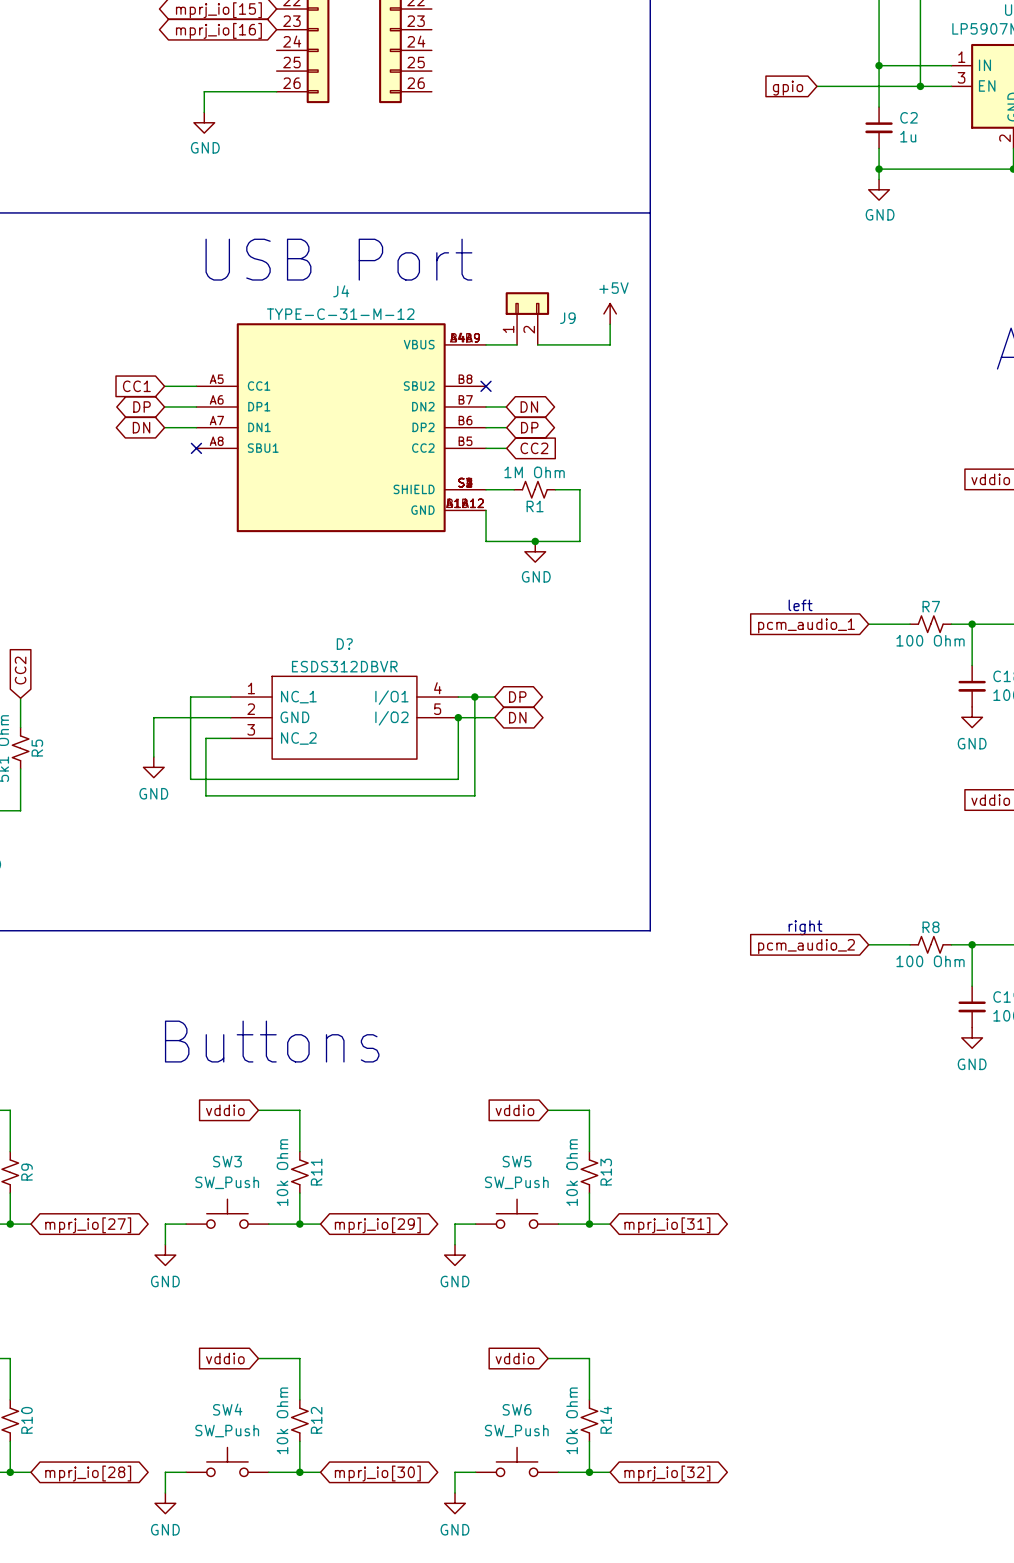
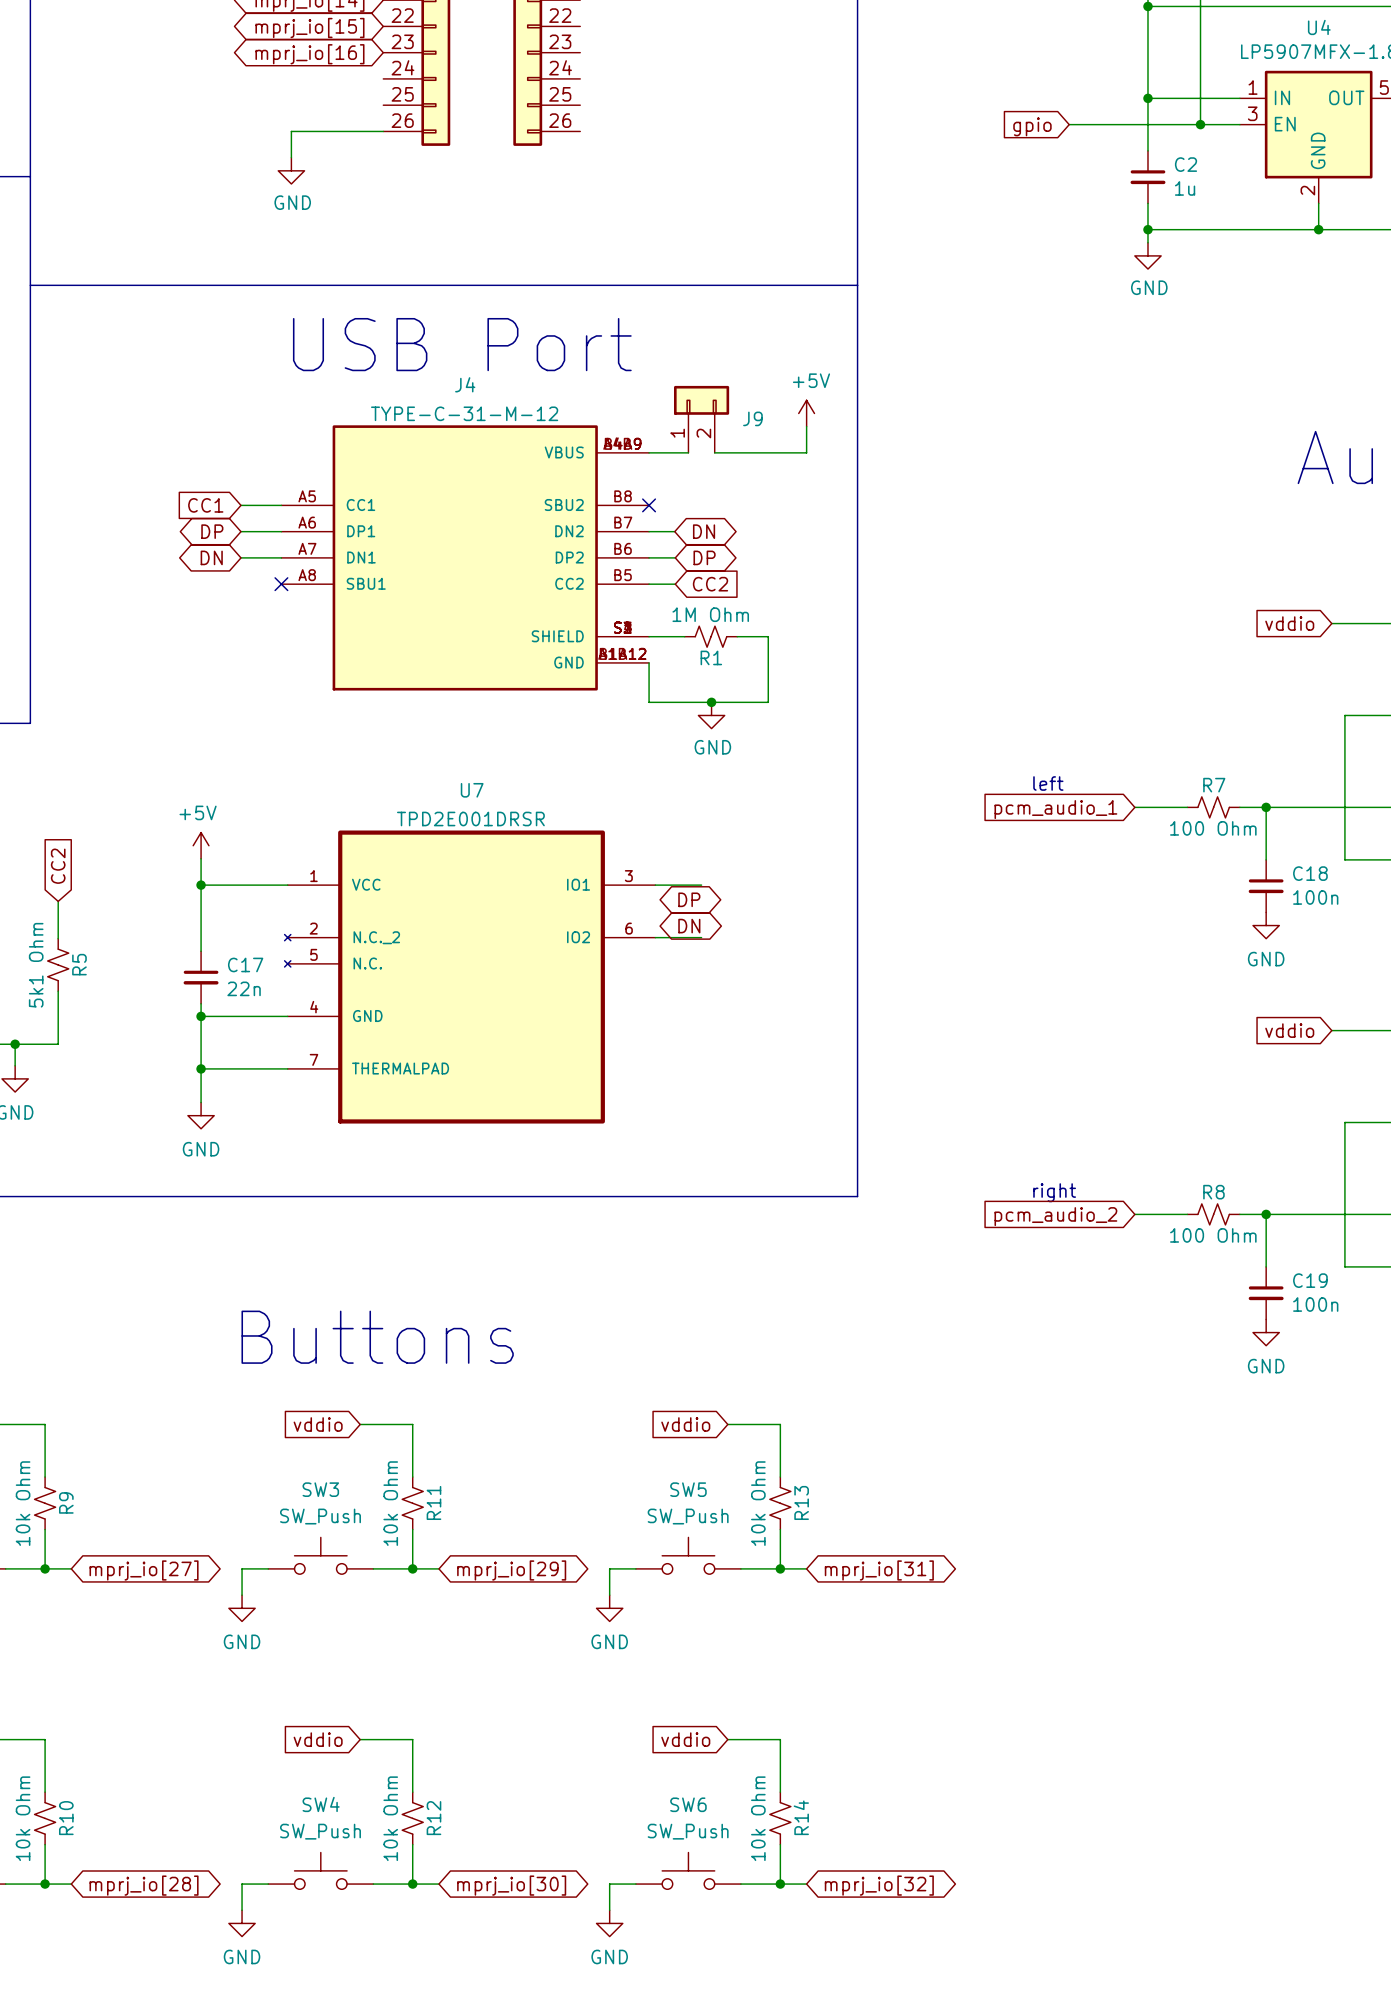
power symbol: none -> +5V (201, 845)
wire: none -> (201, 858) (201, 951)
wire: none -> (201, 885) (287, 885)
junction: none -> (201, 885)
wire: (230, 697) (190, 697) (190, 779) (458, 779) (458, 717) (494, 717) -> none
wire: (458, 697) (494, 697) -> (655, 885) (701, 885)
wire: (474, 697) (474, 795) (205, 795) (205, 738) (230, 738) -> none
junction: (474, 697) -> none
wire: (230, 717) (153, 717) (153, 756) -> none
D?: ESDS312DBVR (344, 717) -> none
junction: (458, 717) -> none
wire: none -> (655, 937) (701, 937)
U7: none -> TPD2E001DRSR (469, 977)
C17: none -> 22n (201, 977)
power symbol position: GND (153, 767) -> GND (201, 1115)
wire: none -> (201, 1003) (201, 1102)
wire: none -> (201, 1016) (287, 1016)
junction: none -> (201, 1016)
wire: none -> (201, 1068) (287, 1068)
junction: none -> (201, 1068)

